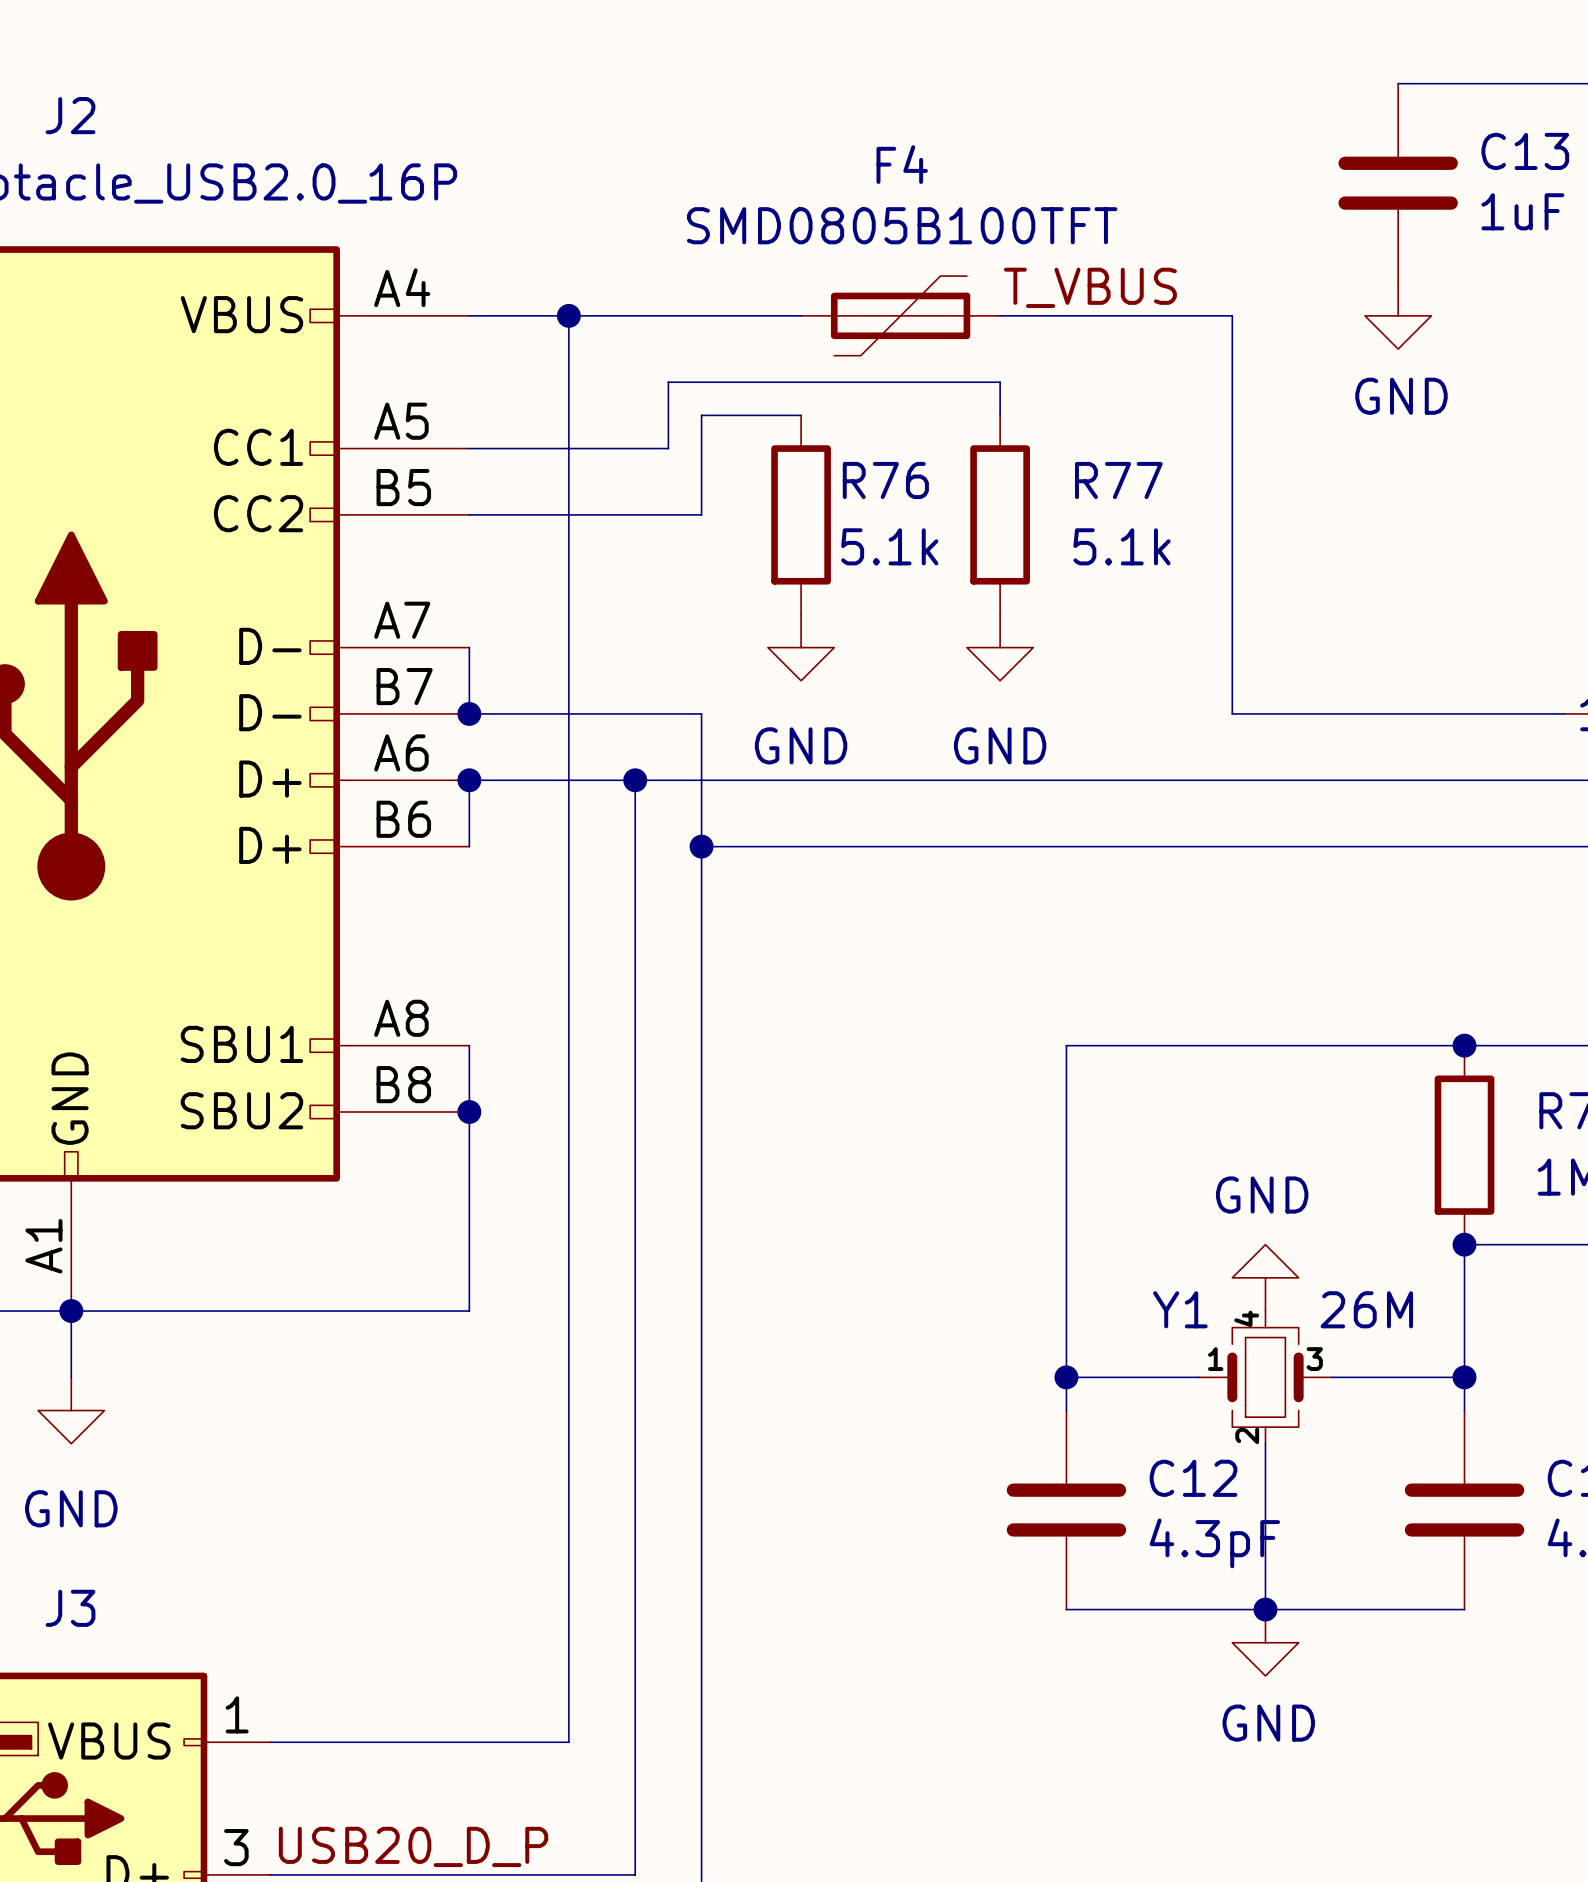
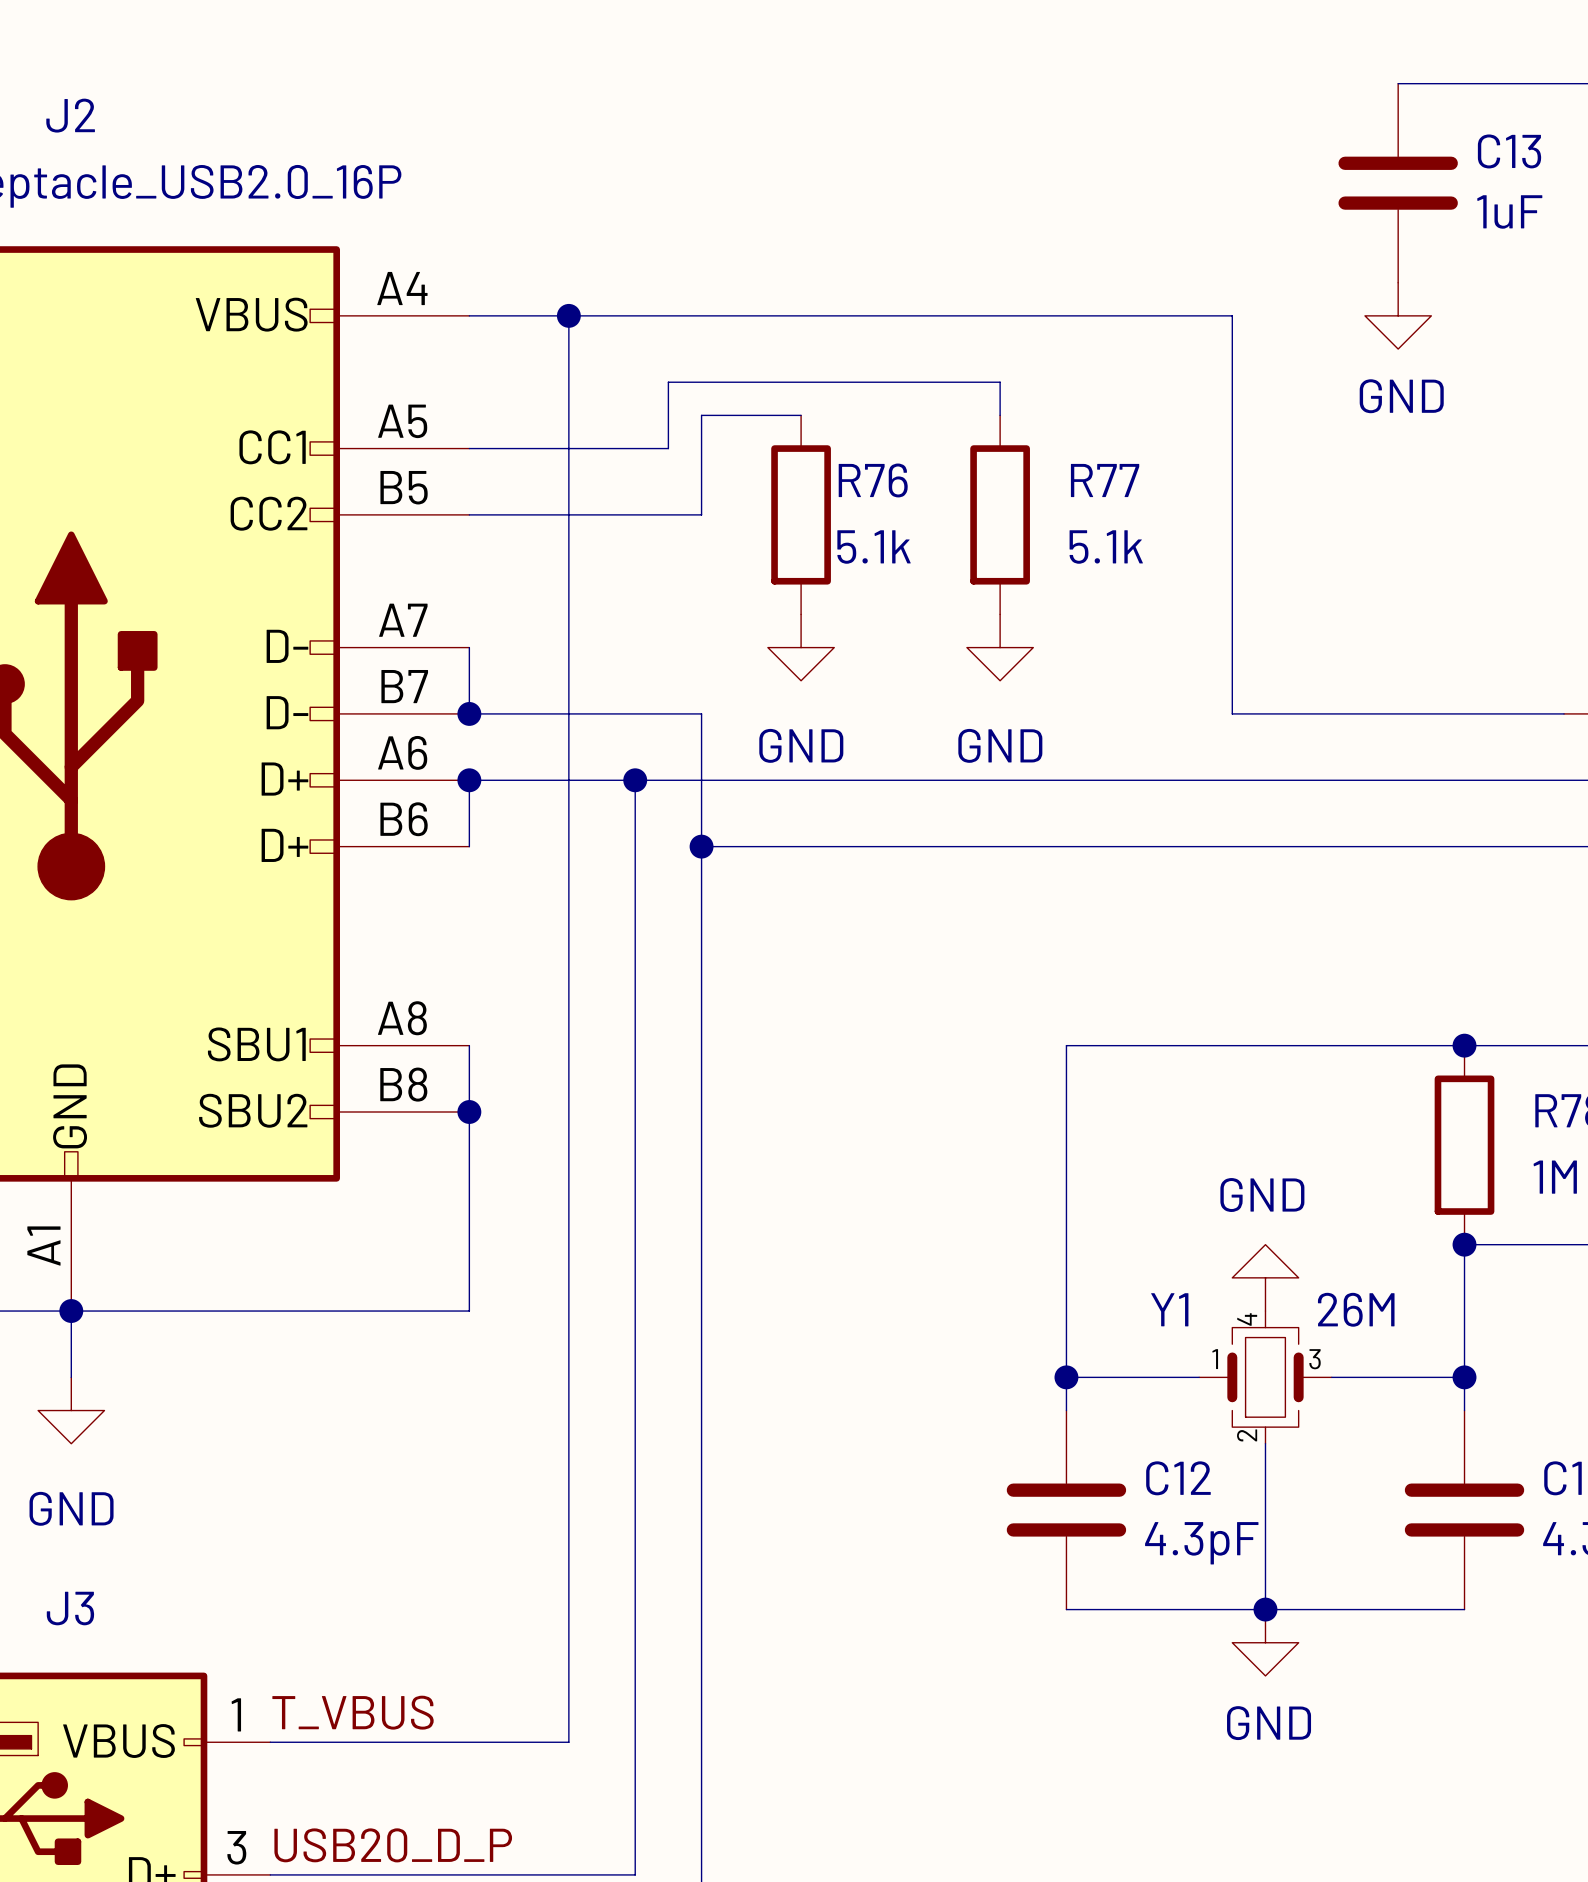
label: T_VBUS (1090, 287) -> none
F4: SMD0805B100TFT (900, 315) -> none
label: none -> T_VBUS (353, 1712)

